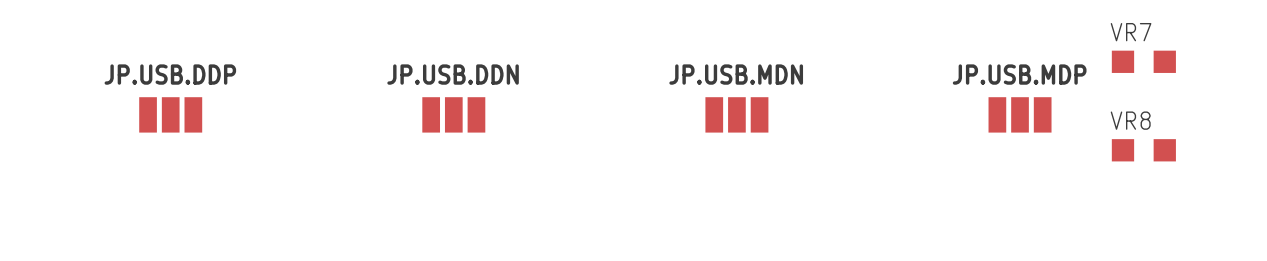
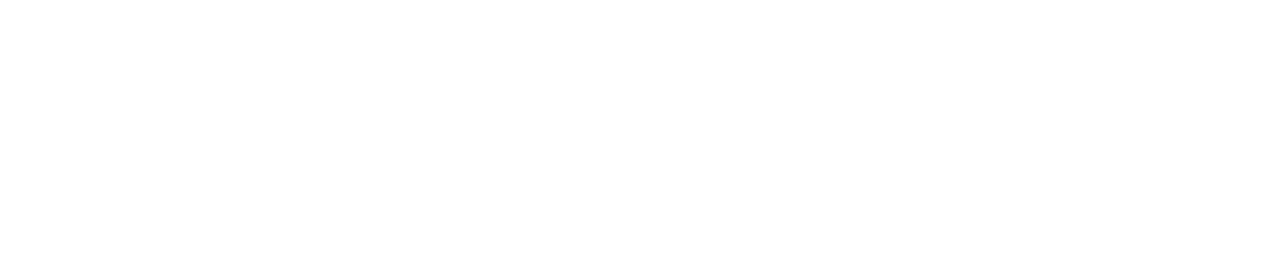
VR7: (1143, 61) -> none
JP.USB.DDP: (170, 114) -> none
JP.USB.DDN: (453, 114) -> none
JP.USB.MDN: (736, 114) -> none
JP.USB.MDP: (1020, 114) -> none
VR8: (1143, 150) -> none

